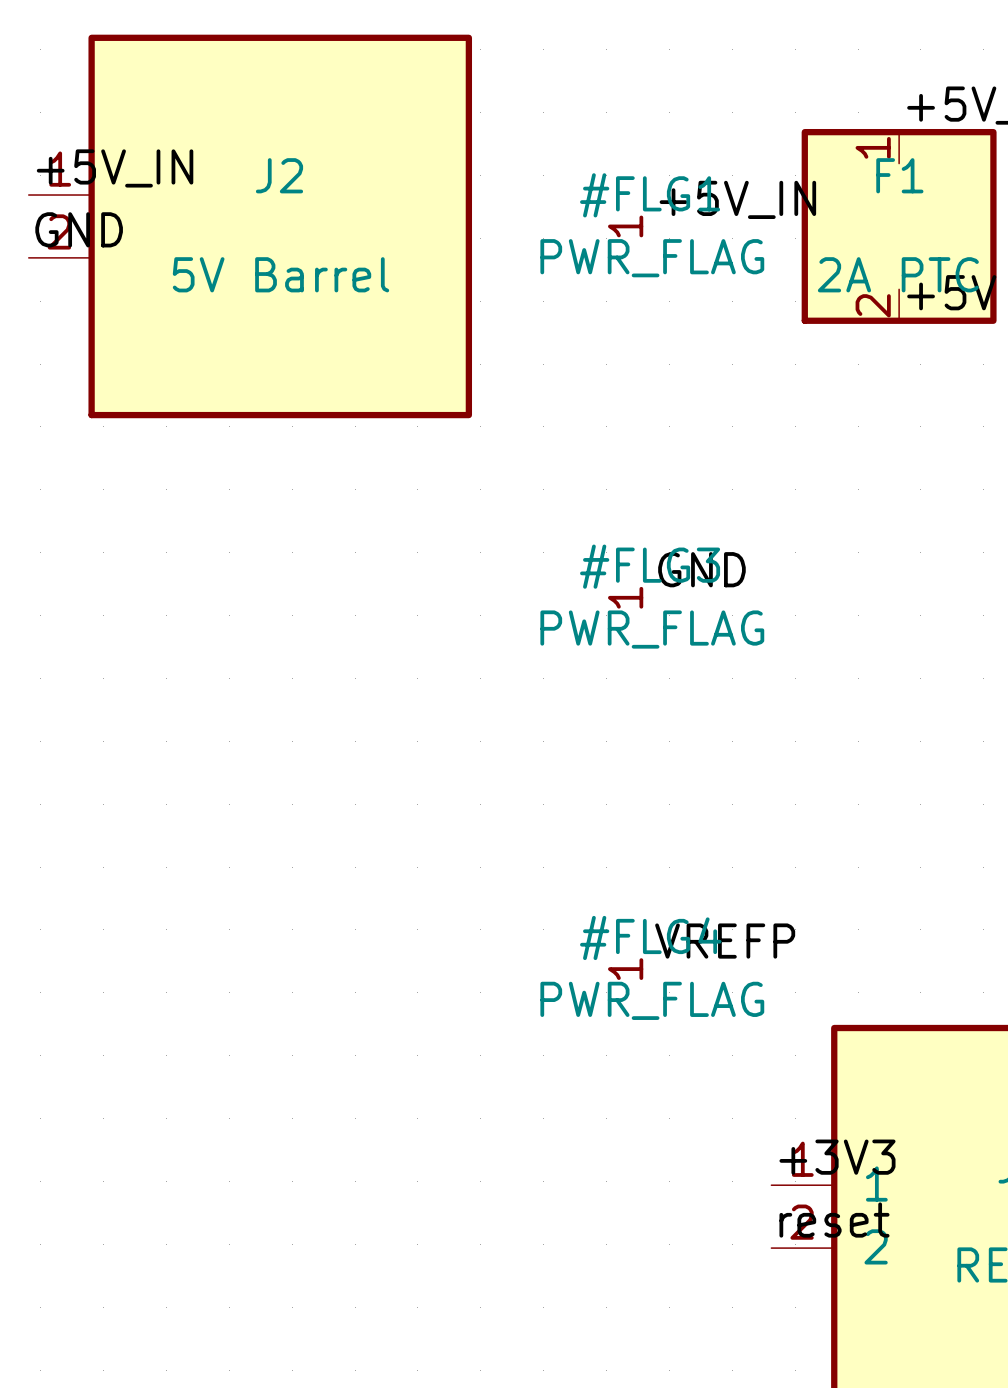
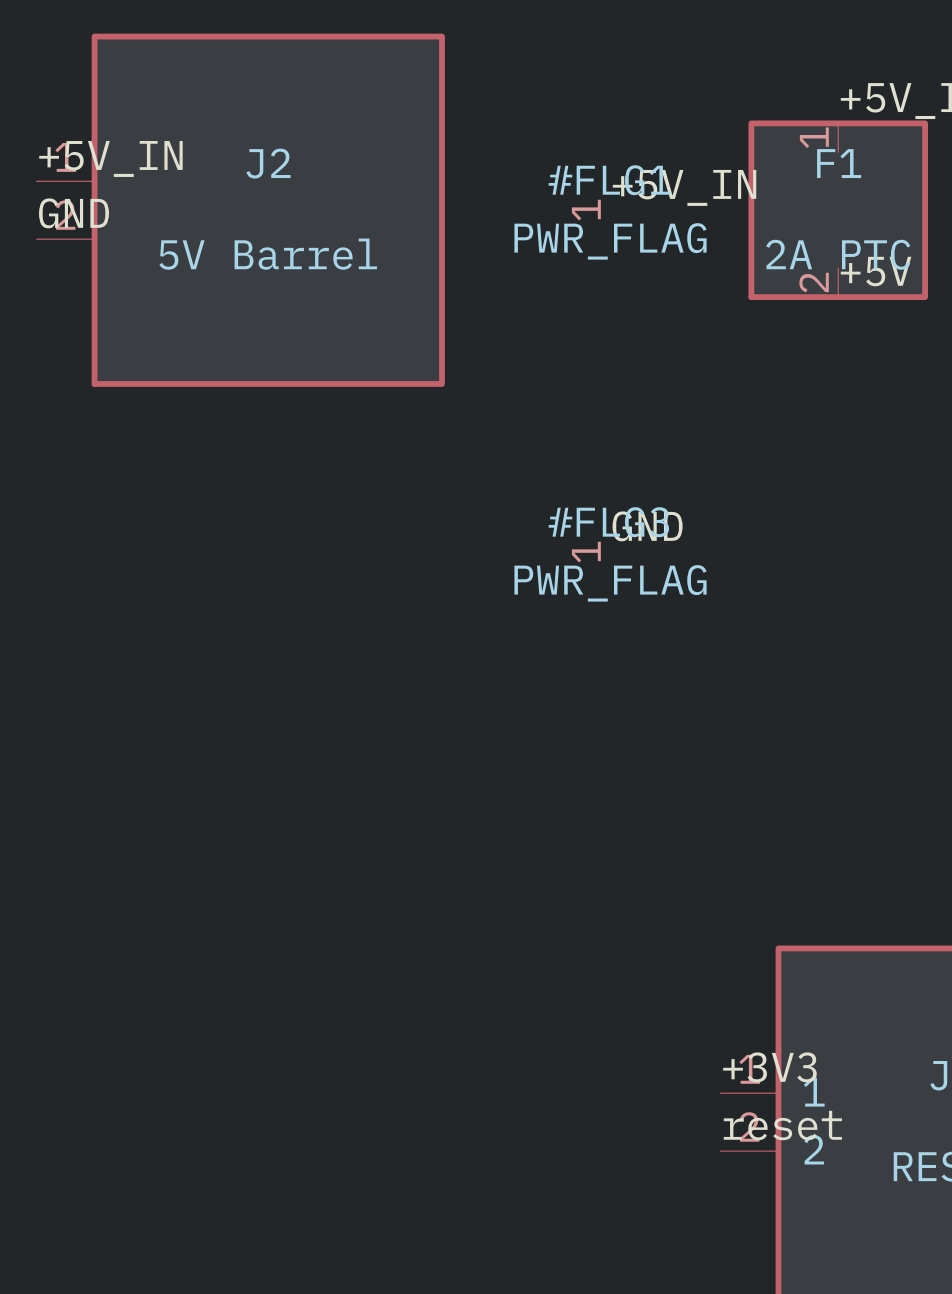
label: VREFP (725, 941) -> none
#FLG4: PWR_FLAG (652, 967) -> none

